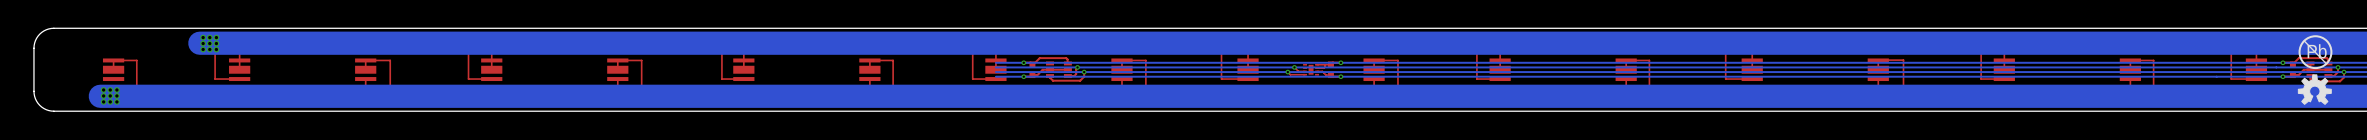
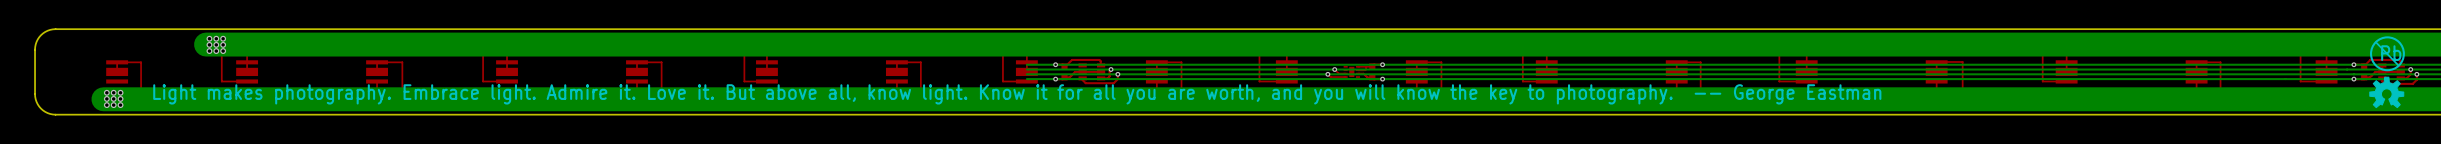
text: none -> Light makes photography. Embrace light. Admire it. Love it. But above all, know light. Know it for all you are worth, and you will know the key to photography. -- George Eastman (1017, 94)

